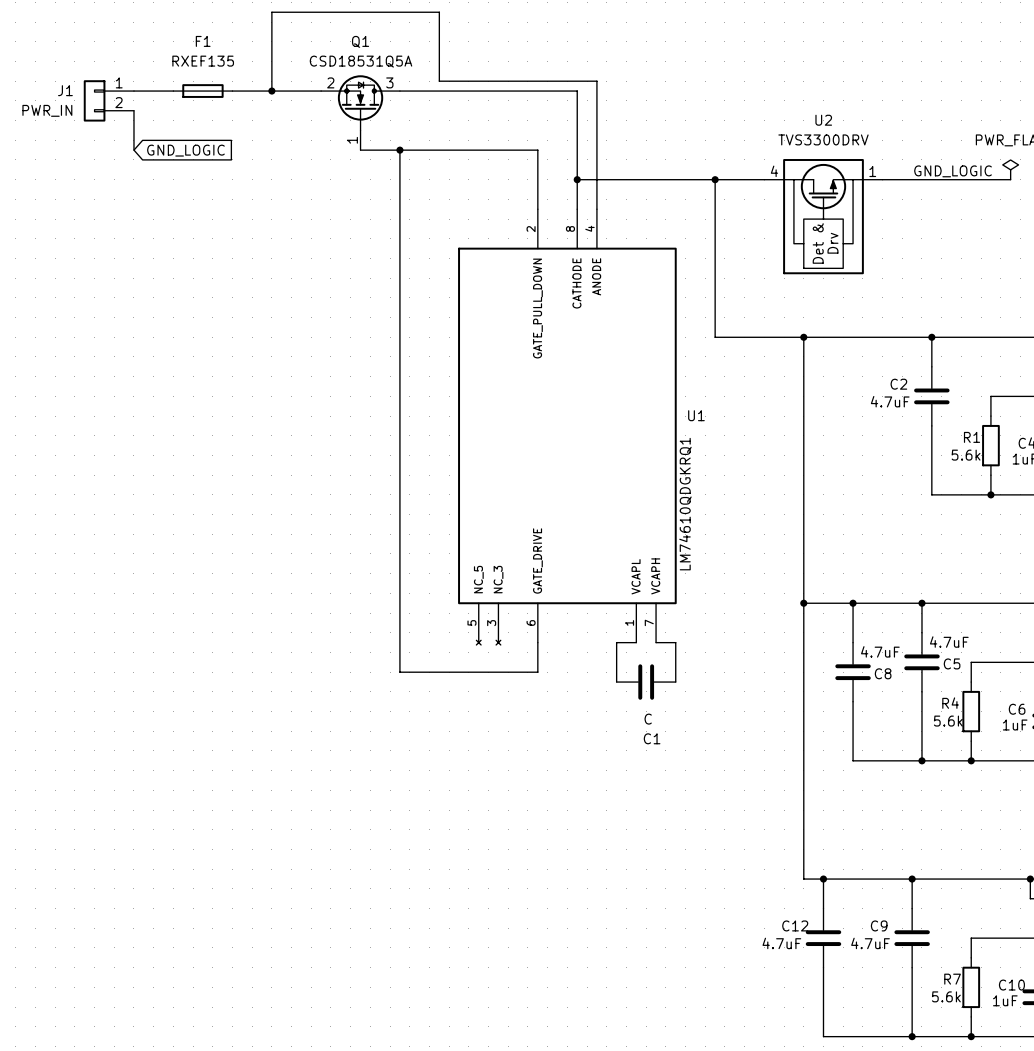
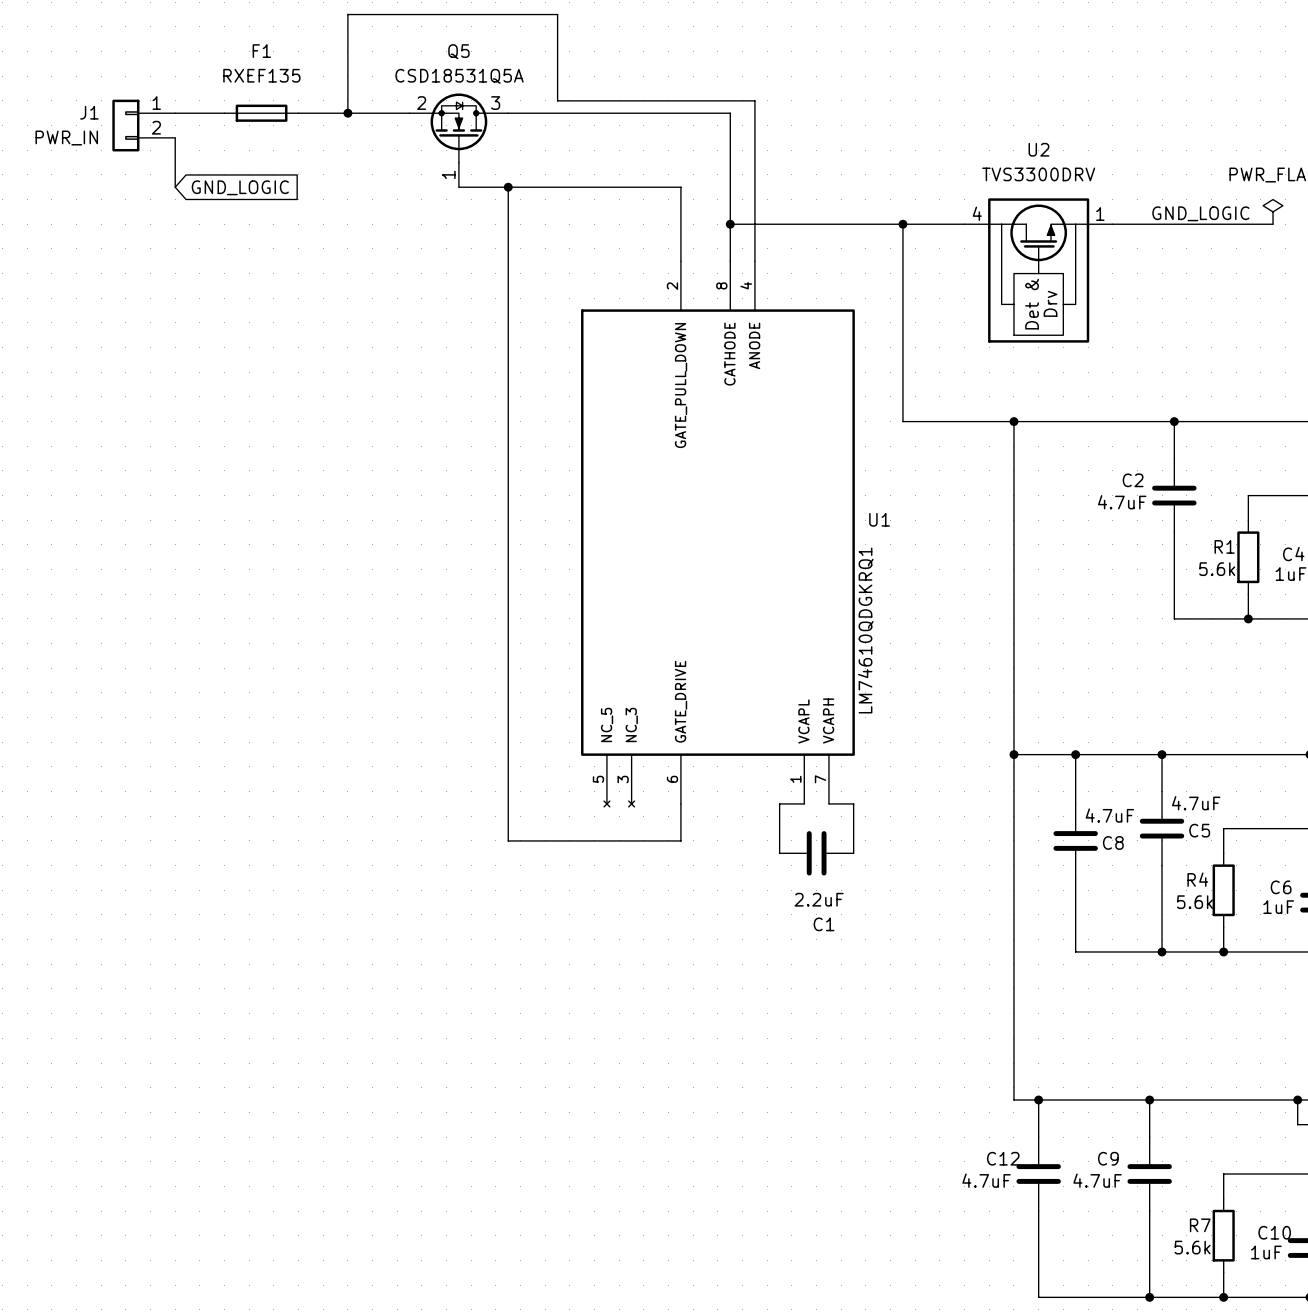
Q1 name: Q1 (360, 41) -> Q5 (458, 51)
C1 value: C (648, 719) -> 2.2uF (819, 899)

